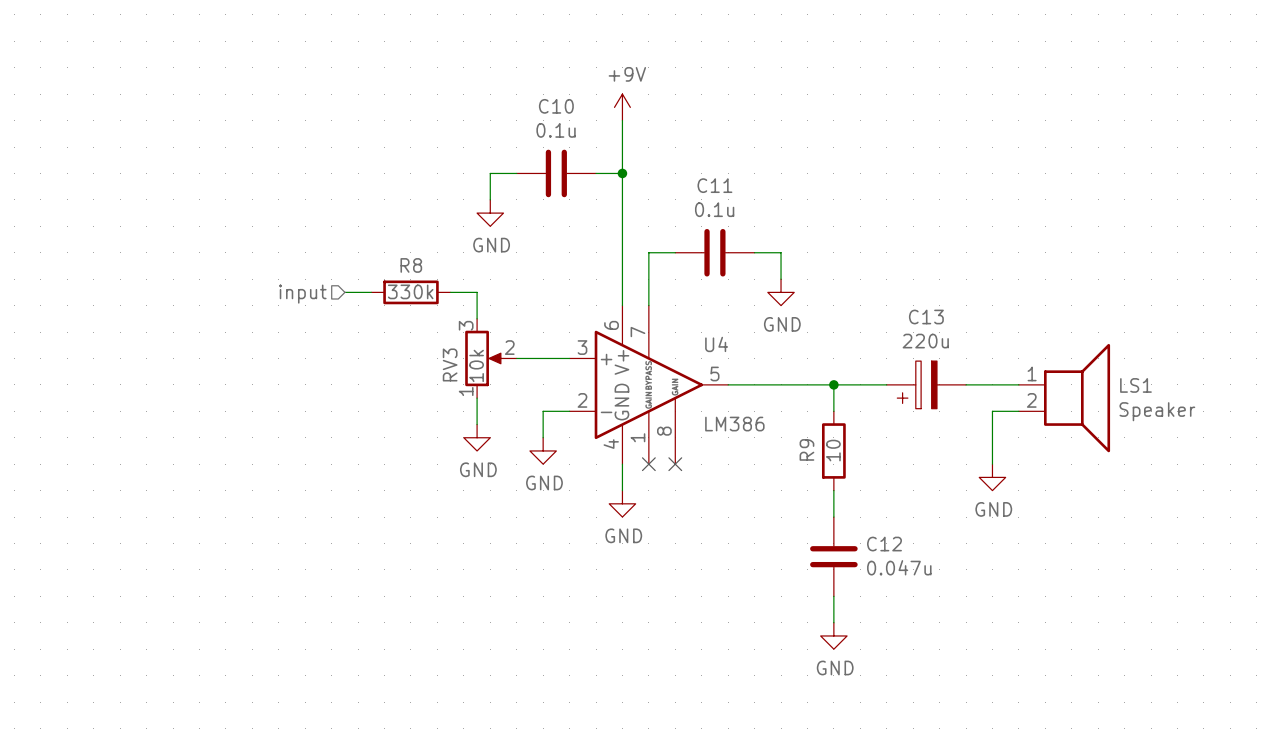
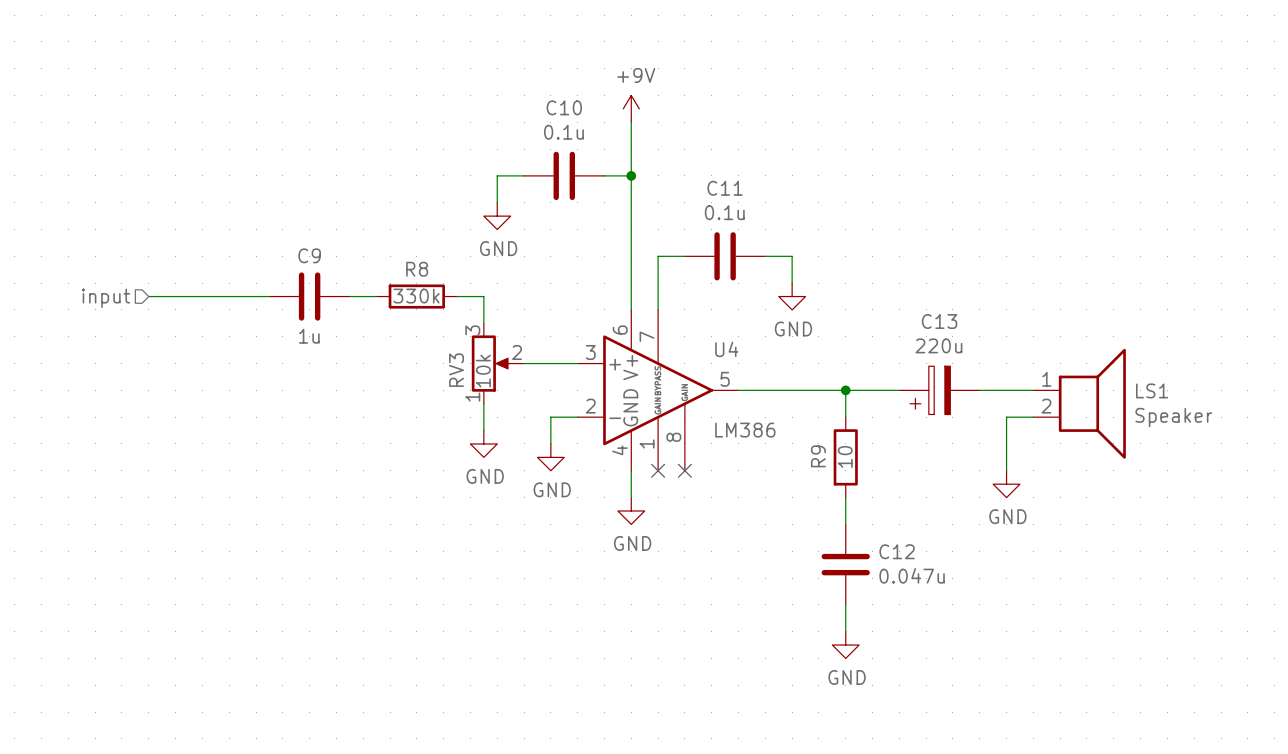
wire: none -> (148, 296) (269, 296)
C9: none -> 1u (309, 296)
hierarchical label position: input (302, 294) -> input (106, 298)

